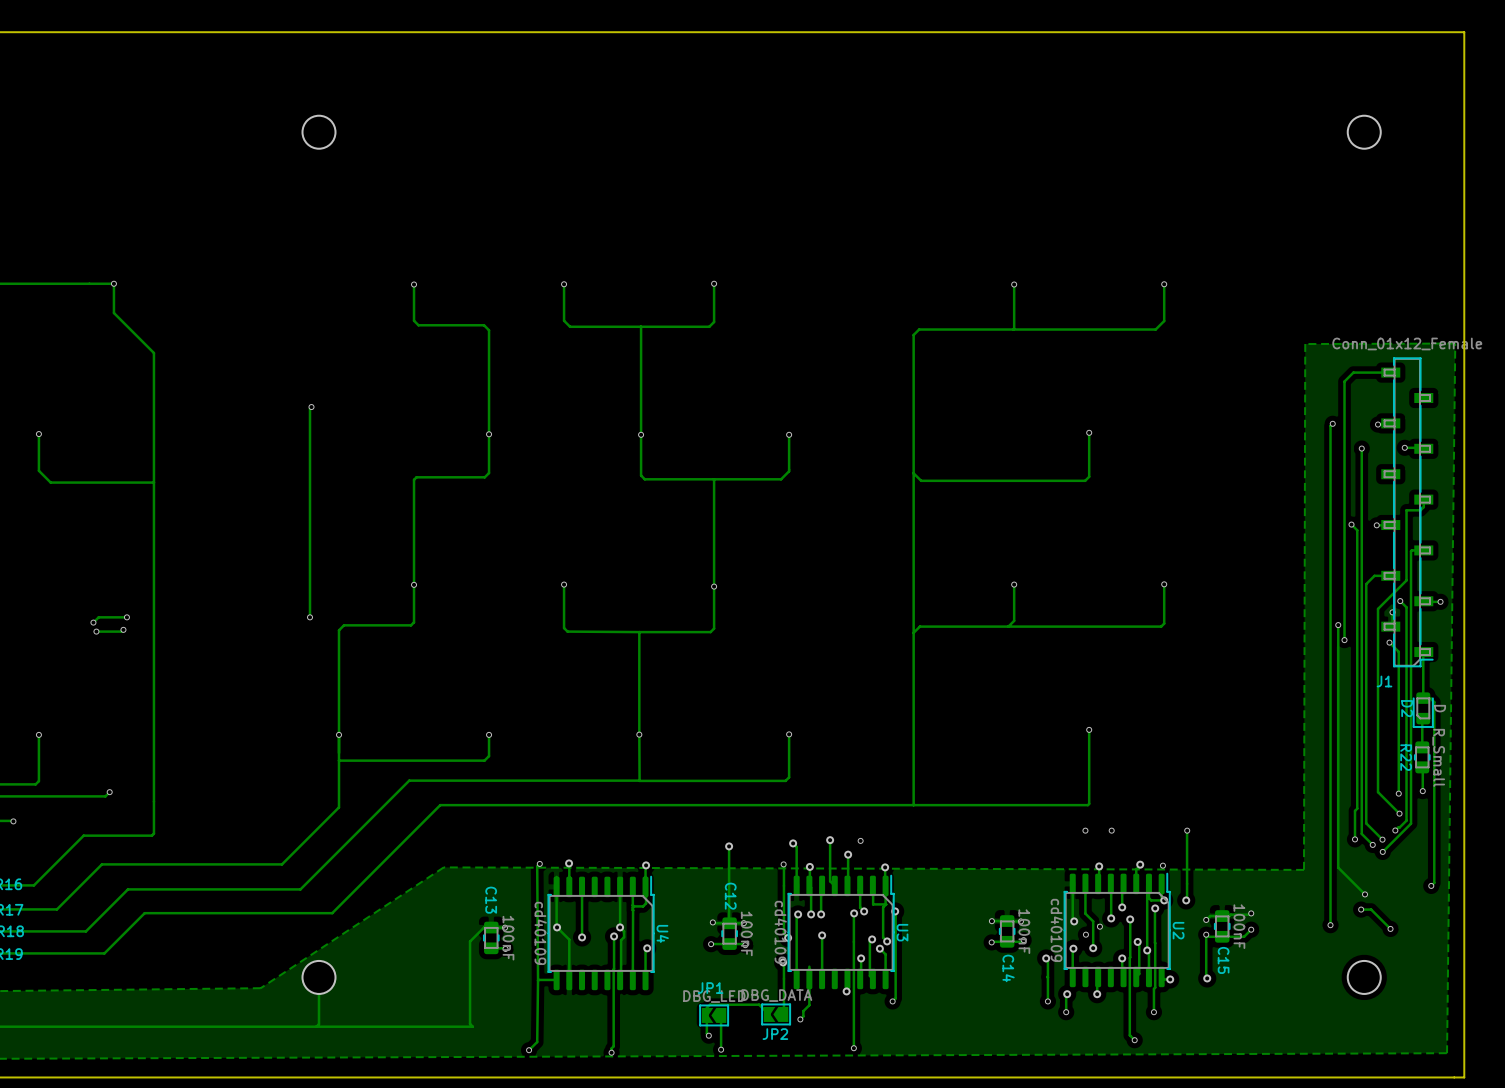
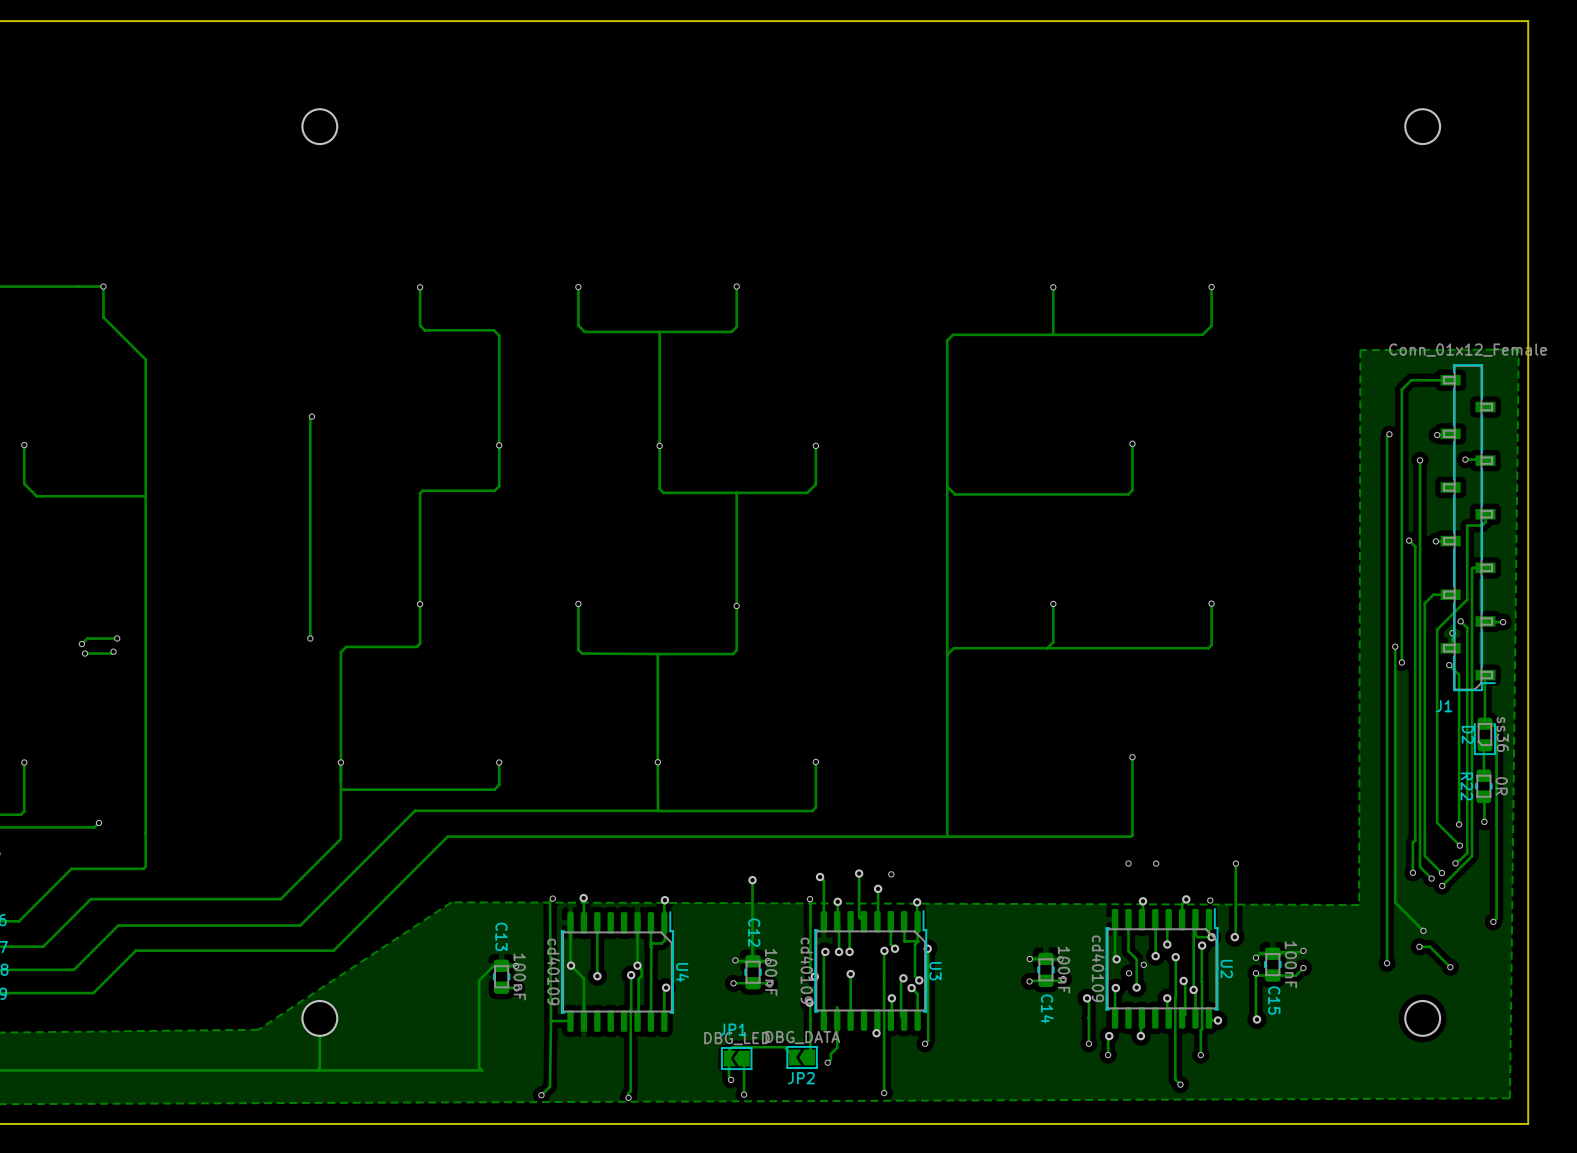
D2 value: D (1440, 708) -> ss36 (1502, 734)
R22 value: R_Small (1438, 757) -> 0R (1501, 786)

